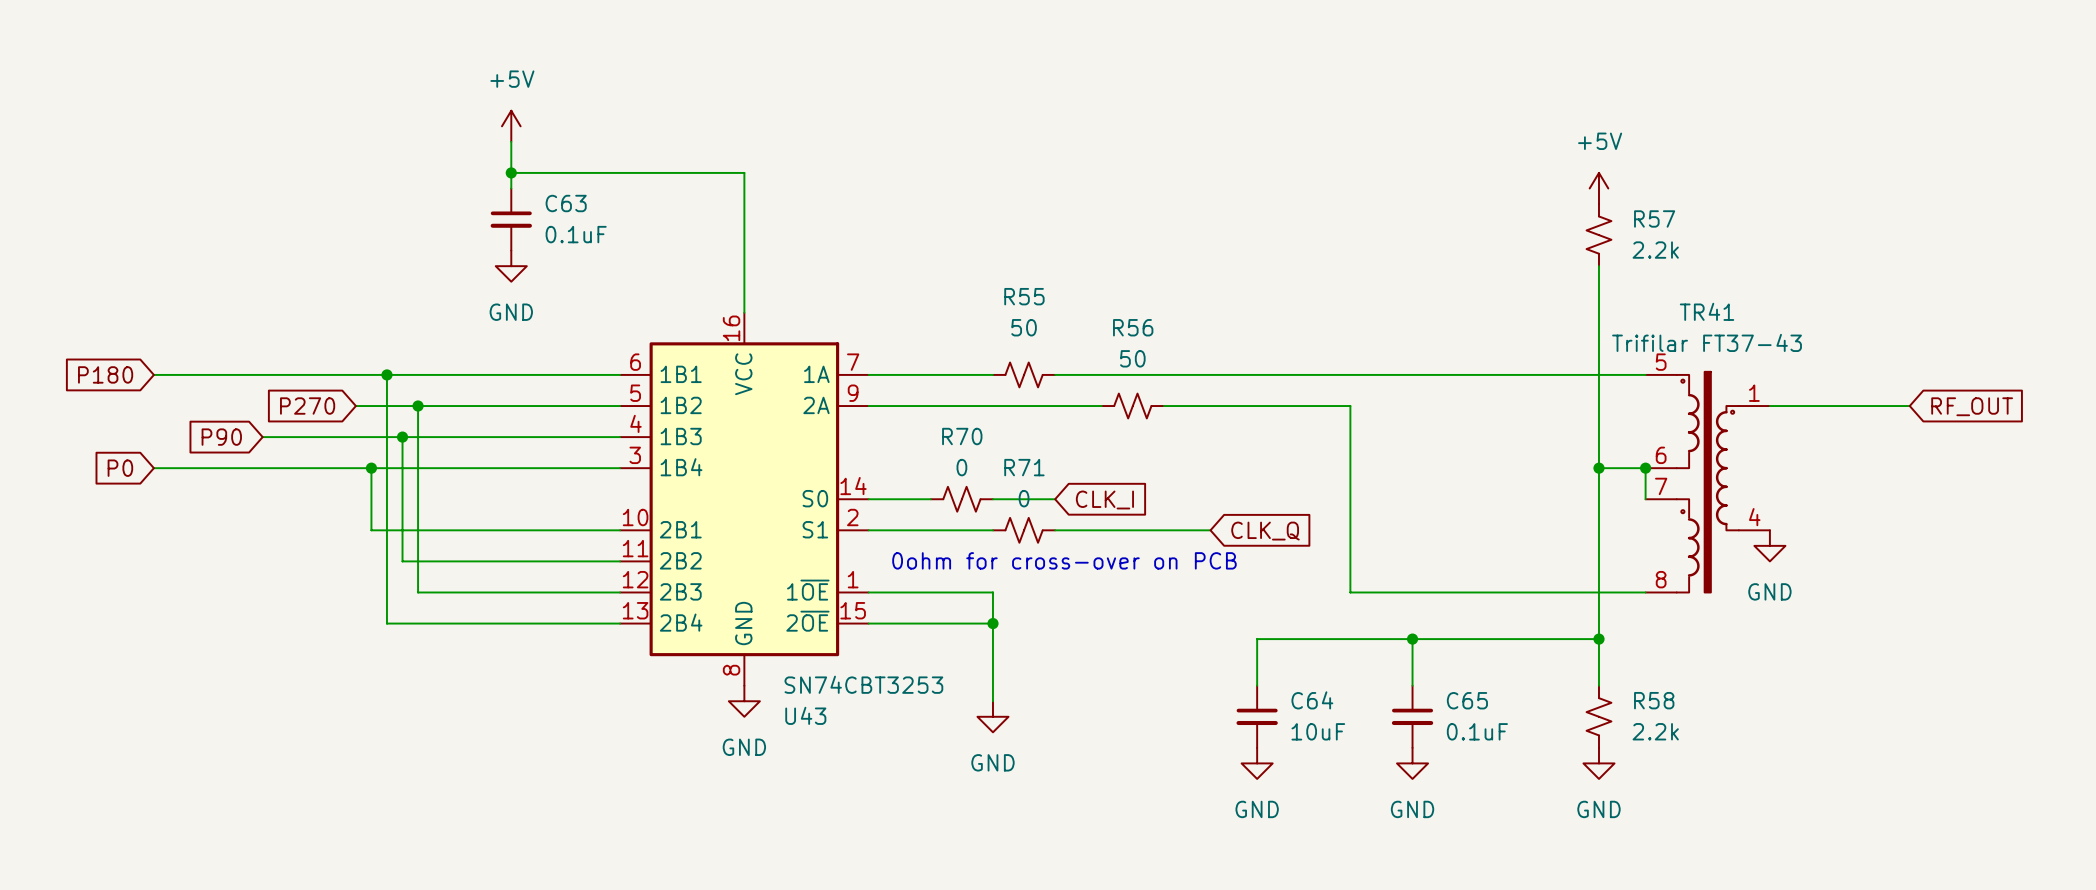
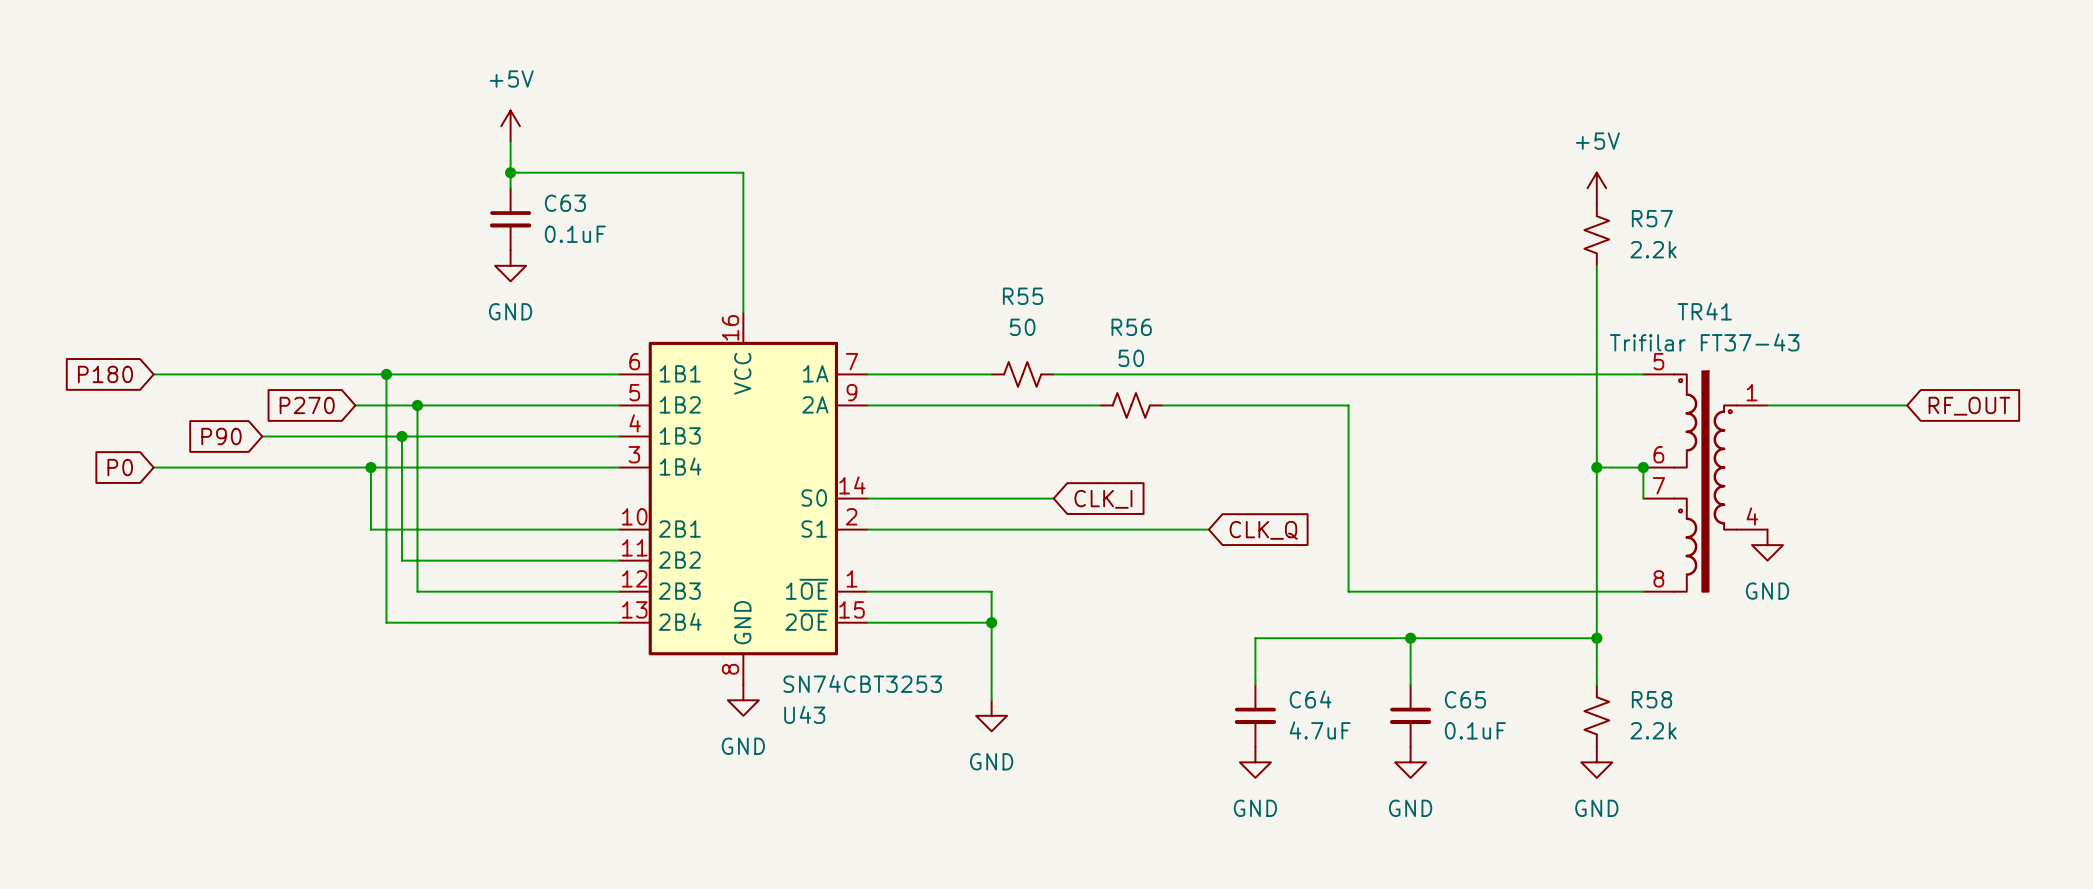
R70: 0 (961, 499) -> none
R71: 0 (1024, 530) -> none
text: 0ohm for cross-over on PCB (1064, 560) -> none
C64 value: 10uF (1318, 731) -> 4.7uF (1320, 730)

